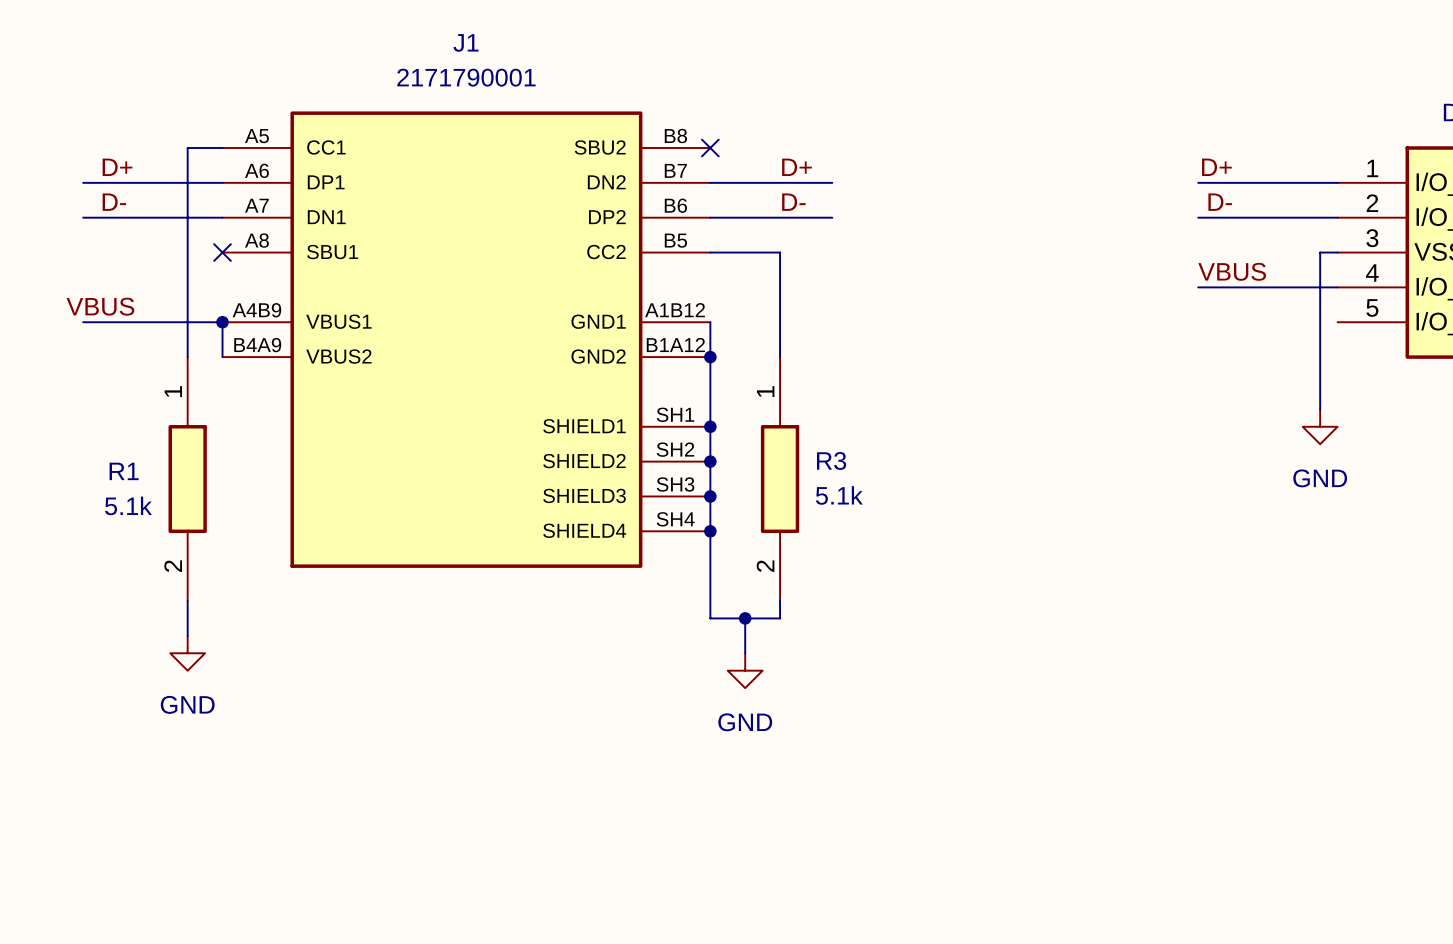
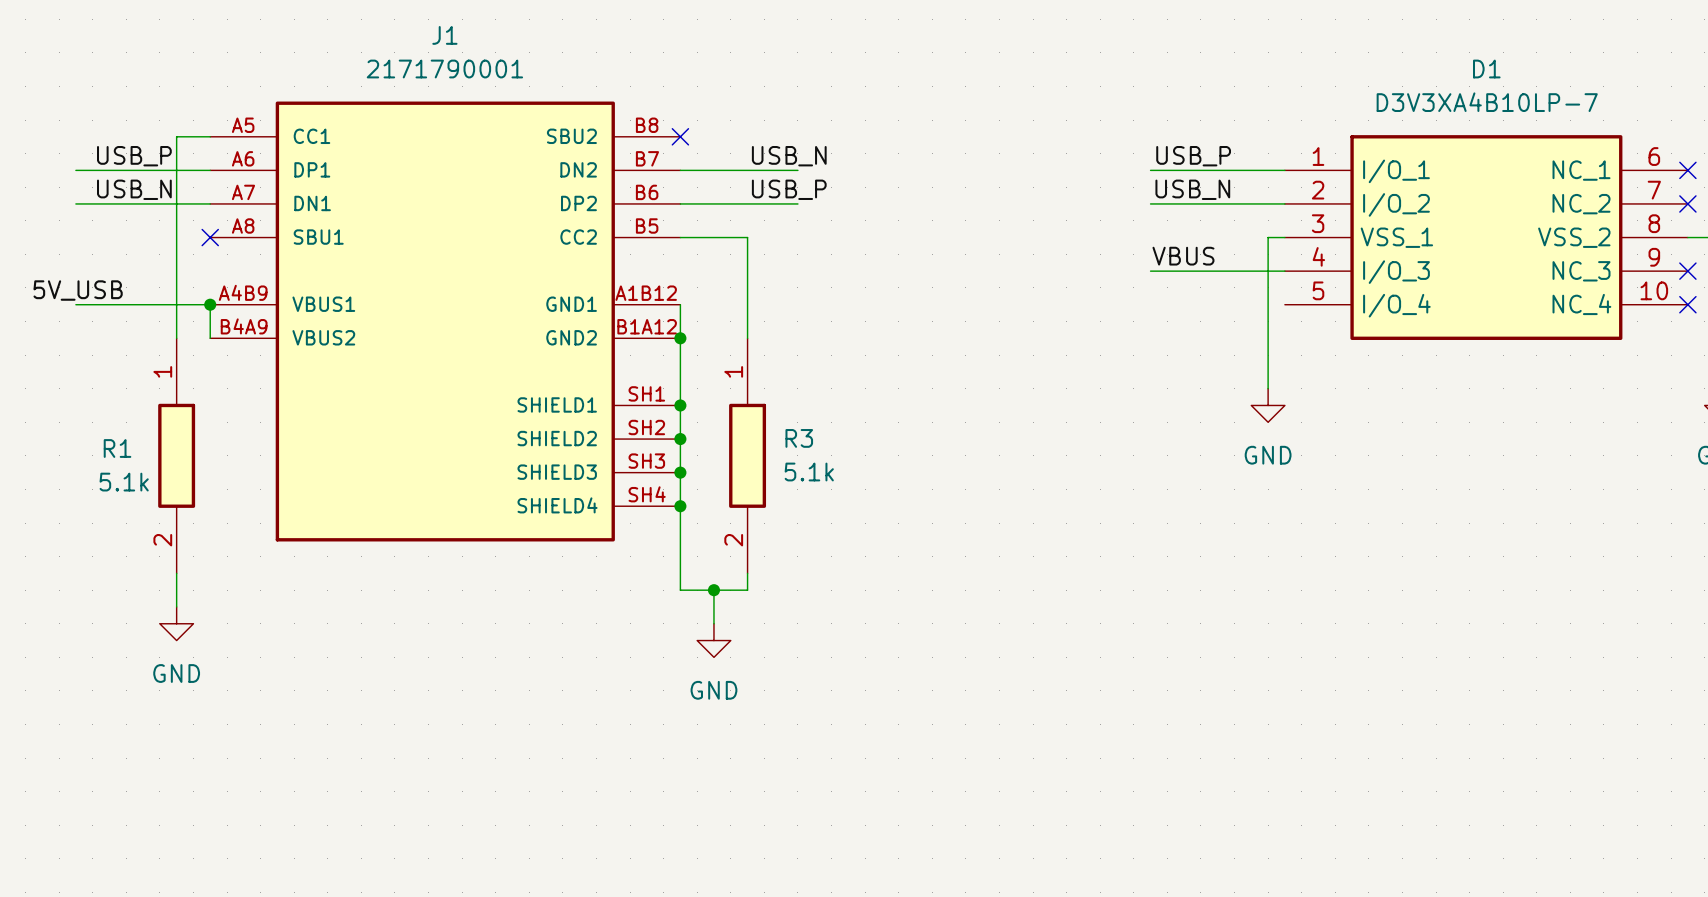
label: D+ (117, 167) -> USB_P (134, 156)
label: D+ (797, 167) -> USB_N (789, 156)
label: D+ (1216, 167) -> none
label: none -> USB_P (1193, 156)
label: D- (114, 202) -> USB_N (134, 189)
label: D- (793, 202) -> USB_P (789, 189)
label: D- (1220, 202) -> none
label: none -> USB_N (1192, 189)
label: VBUS (100, 306) -> 5V_USB (78, 290)

